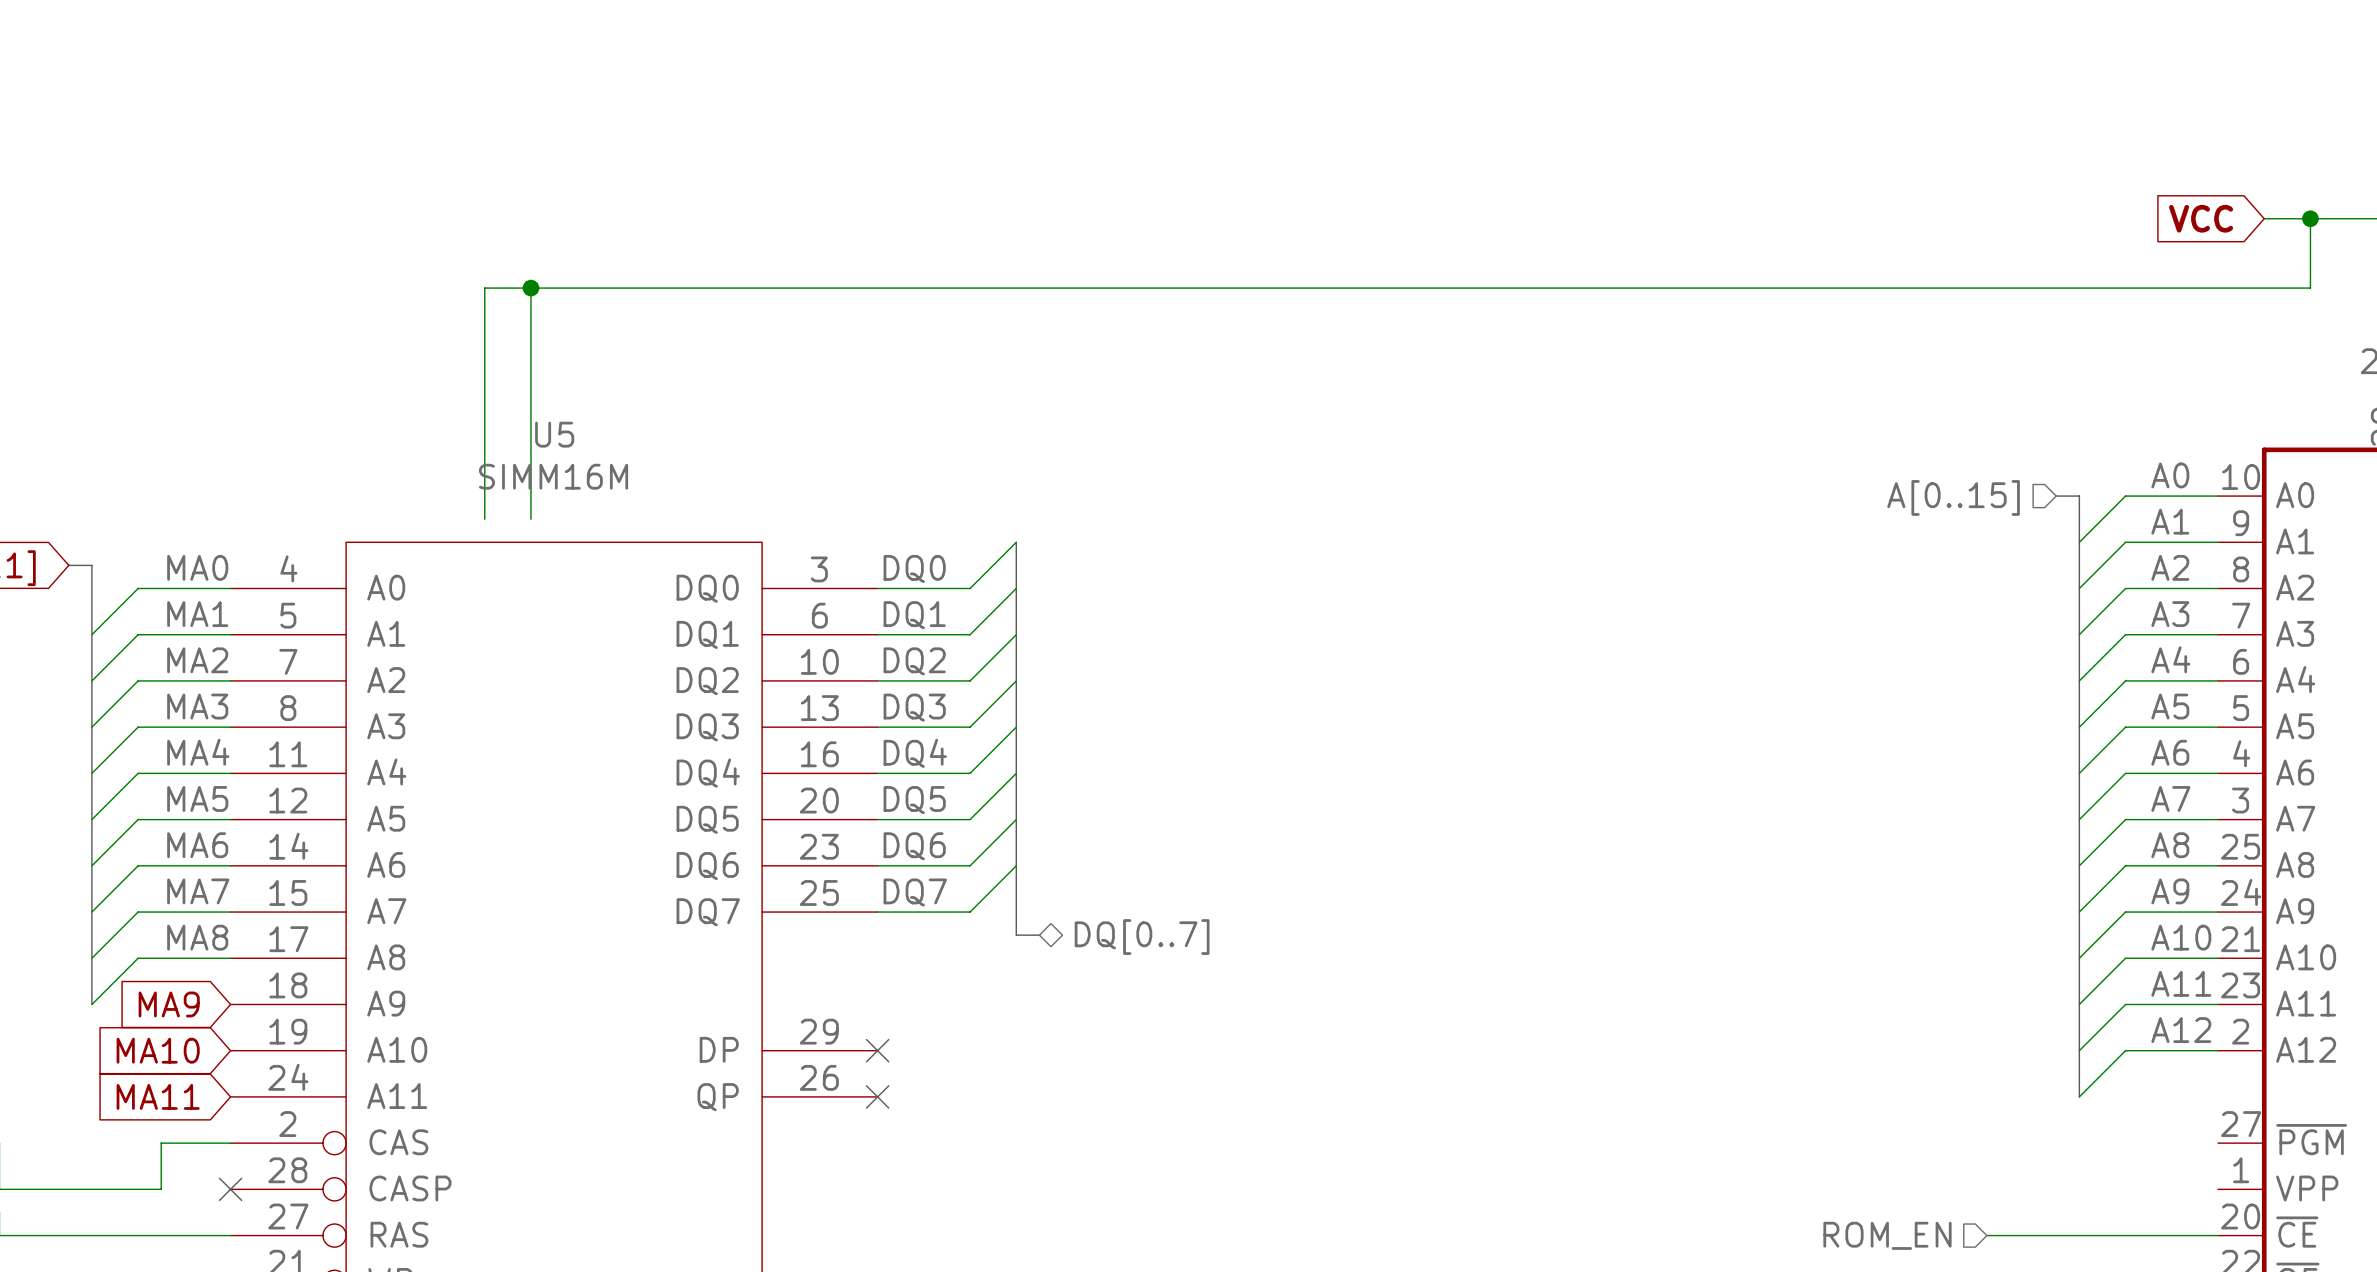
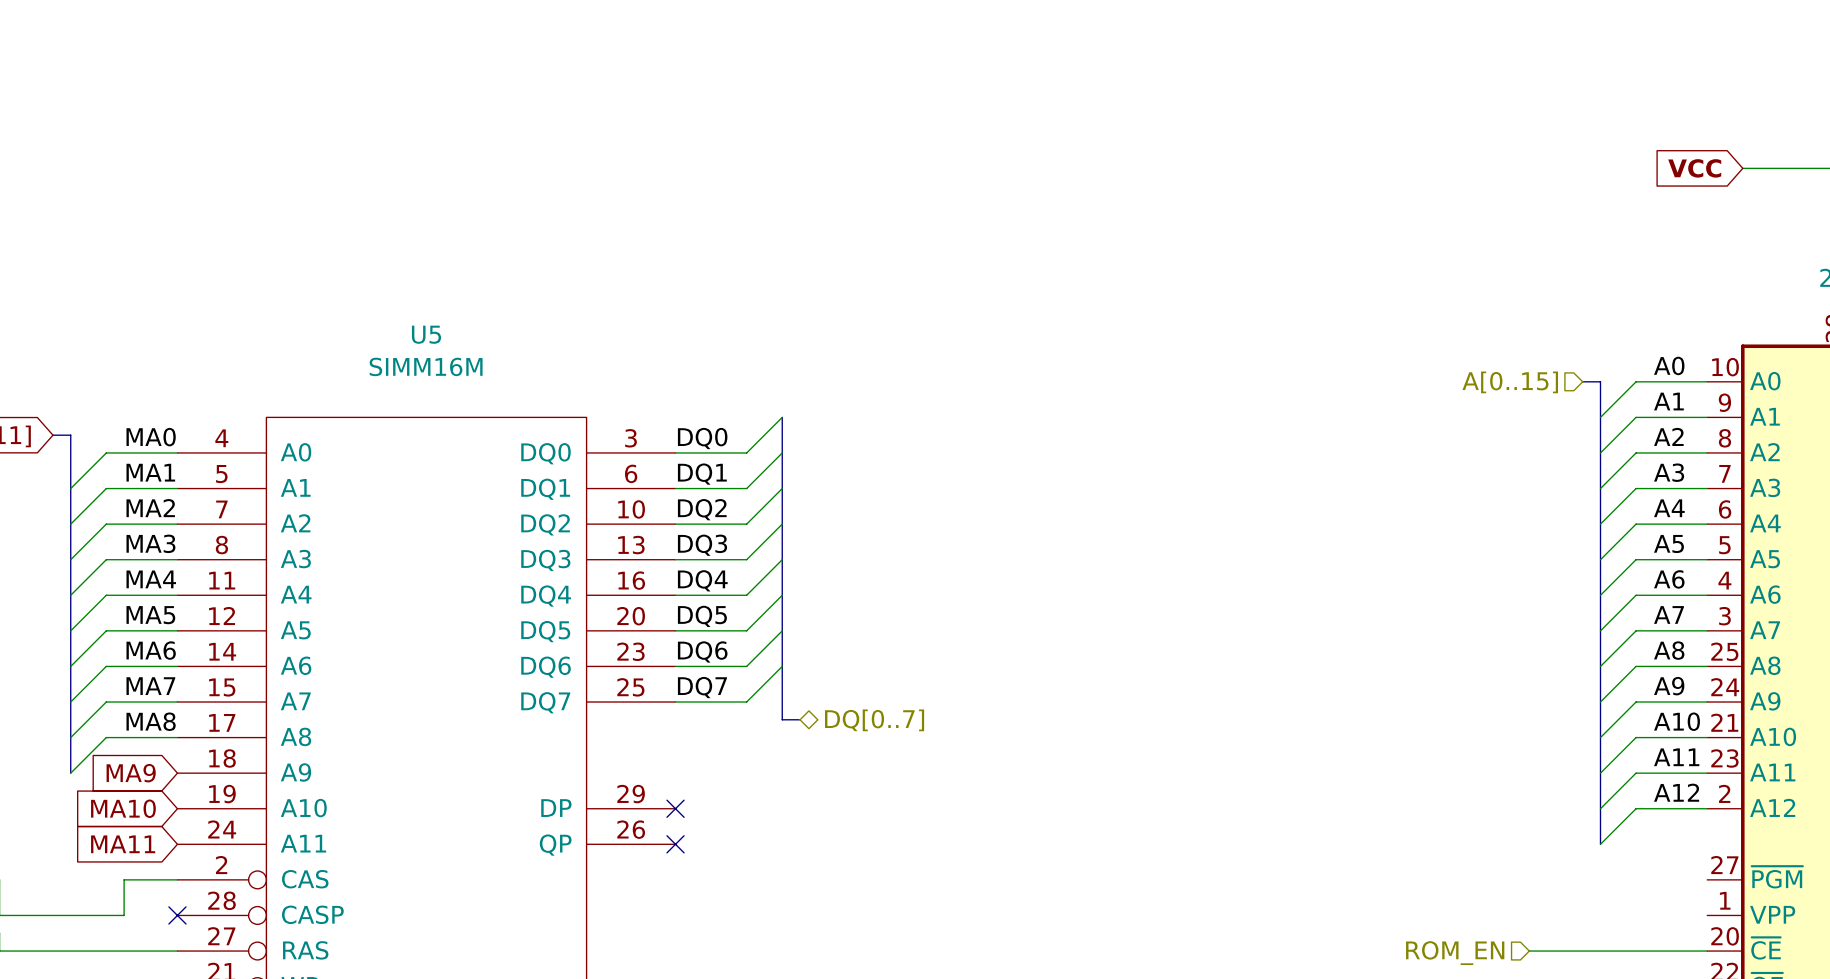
wire: (2310, 218) (2310, 288) (484, 288) (484, 519) -> none
junction: (2310, 218) -> none
wire: (530, 288) (530, 519) -> none
junction: (530, 288) -> none

